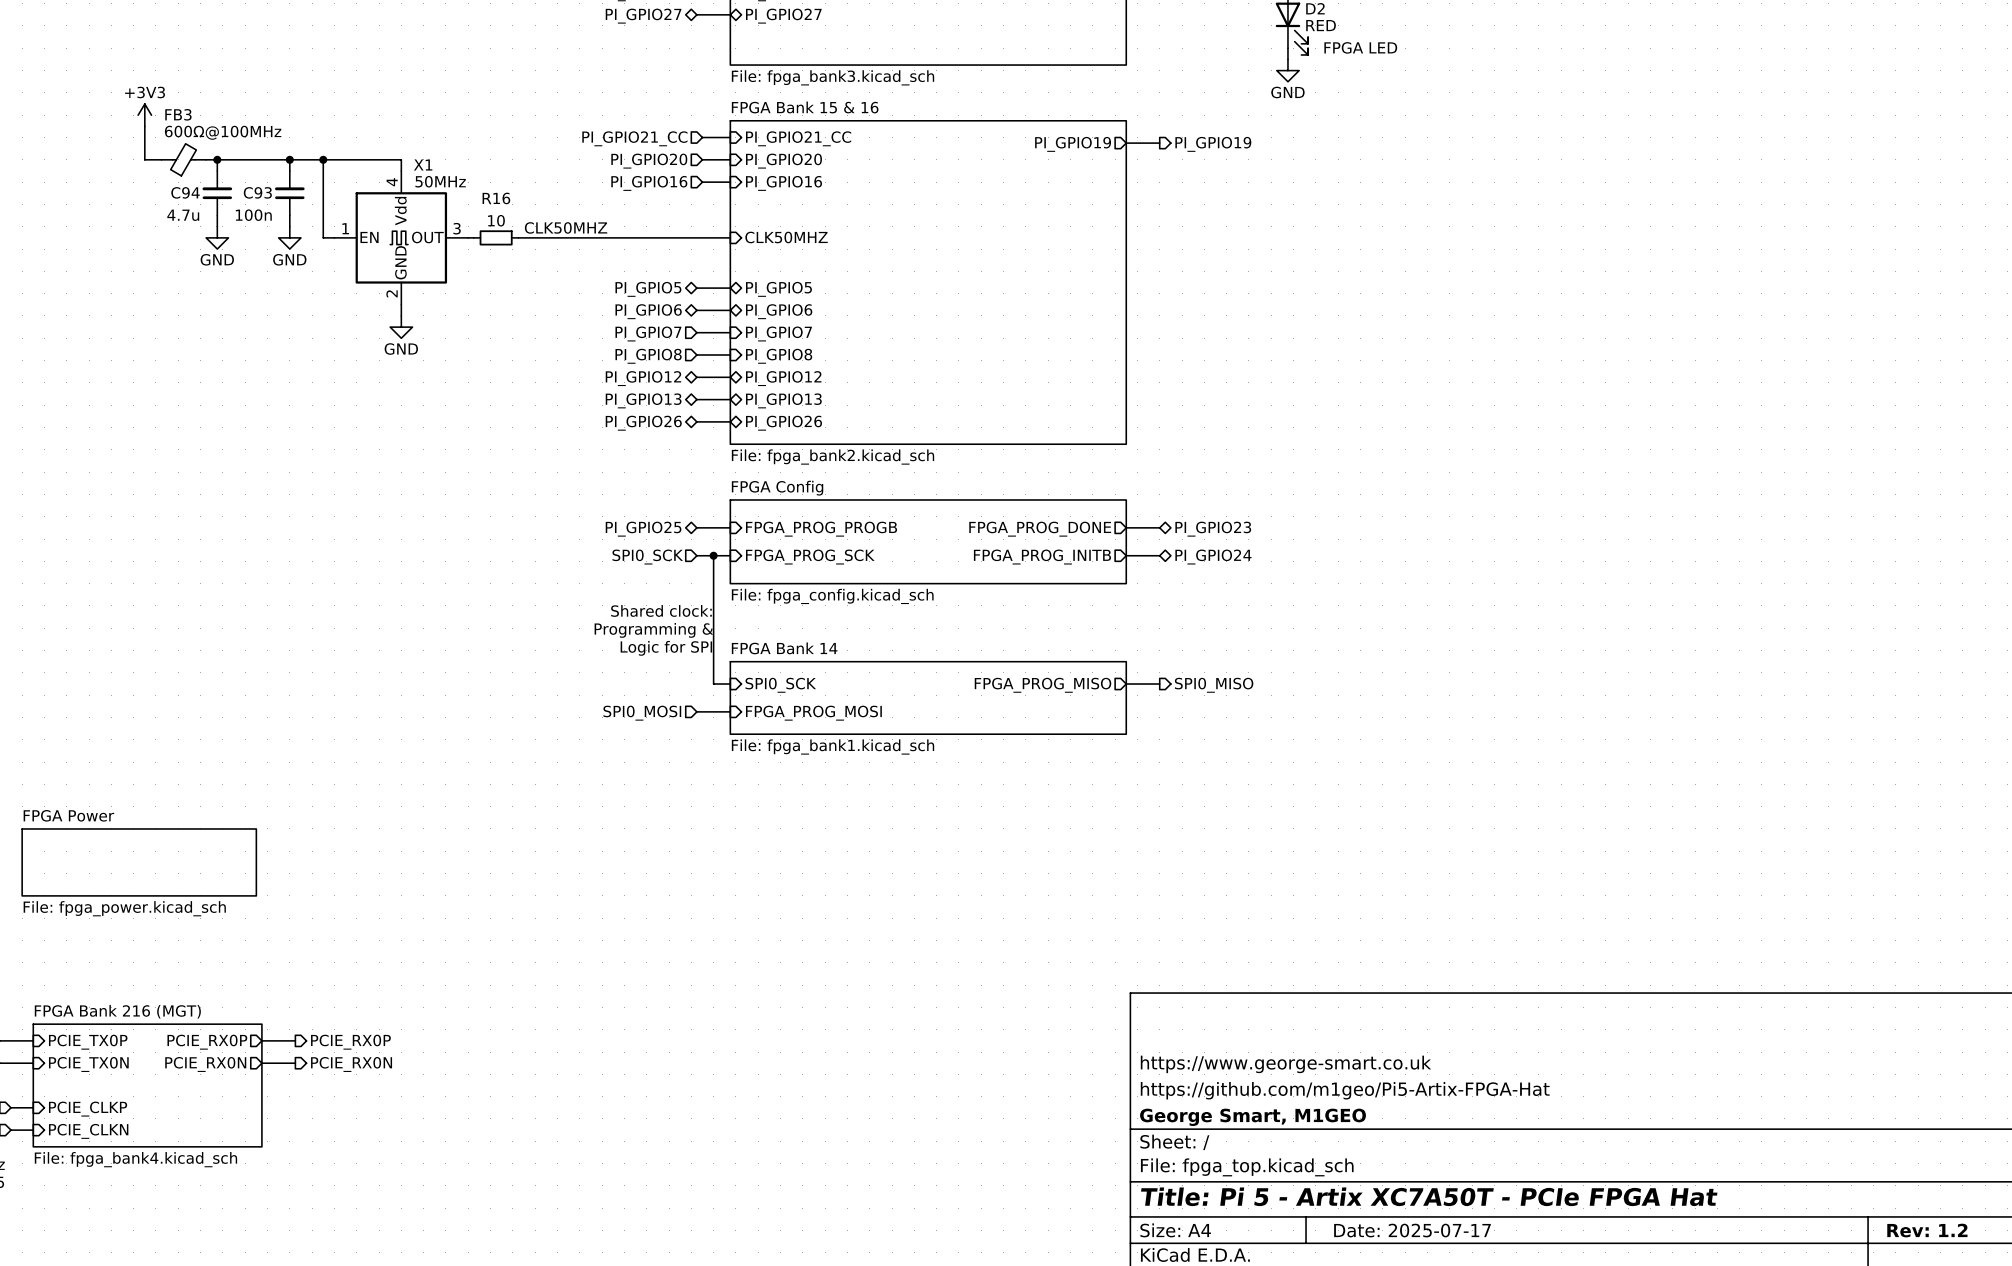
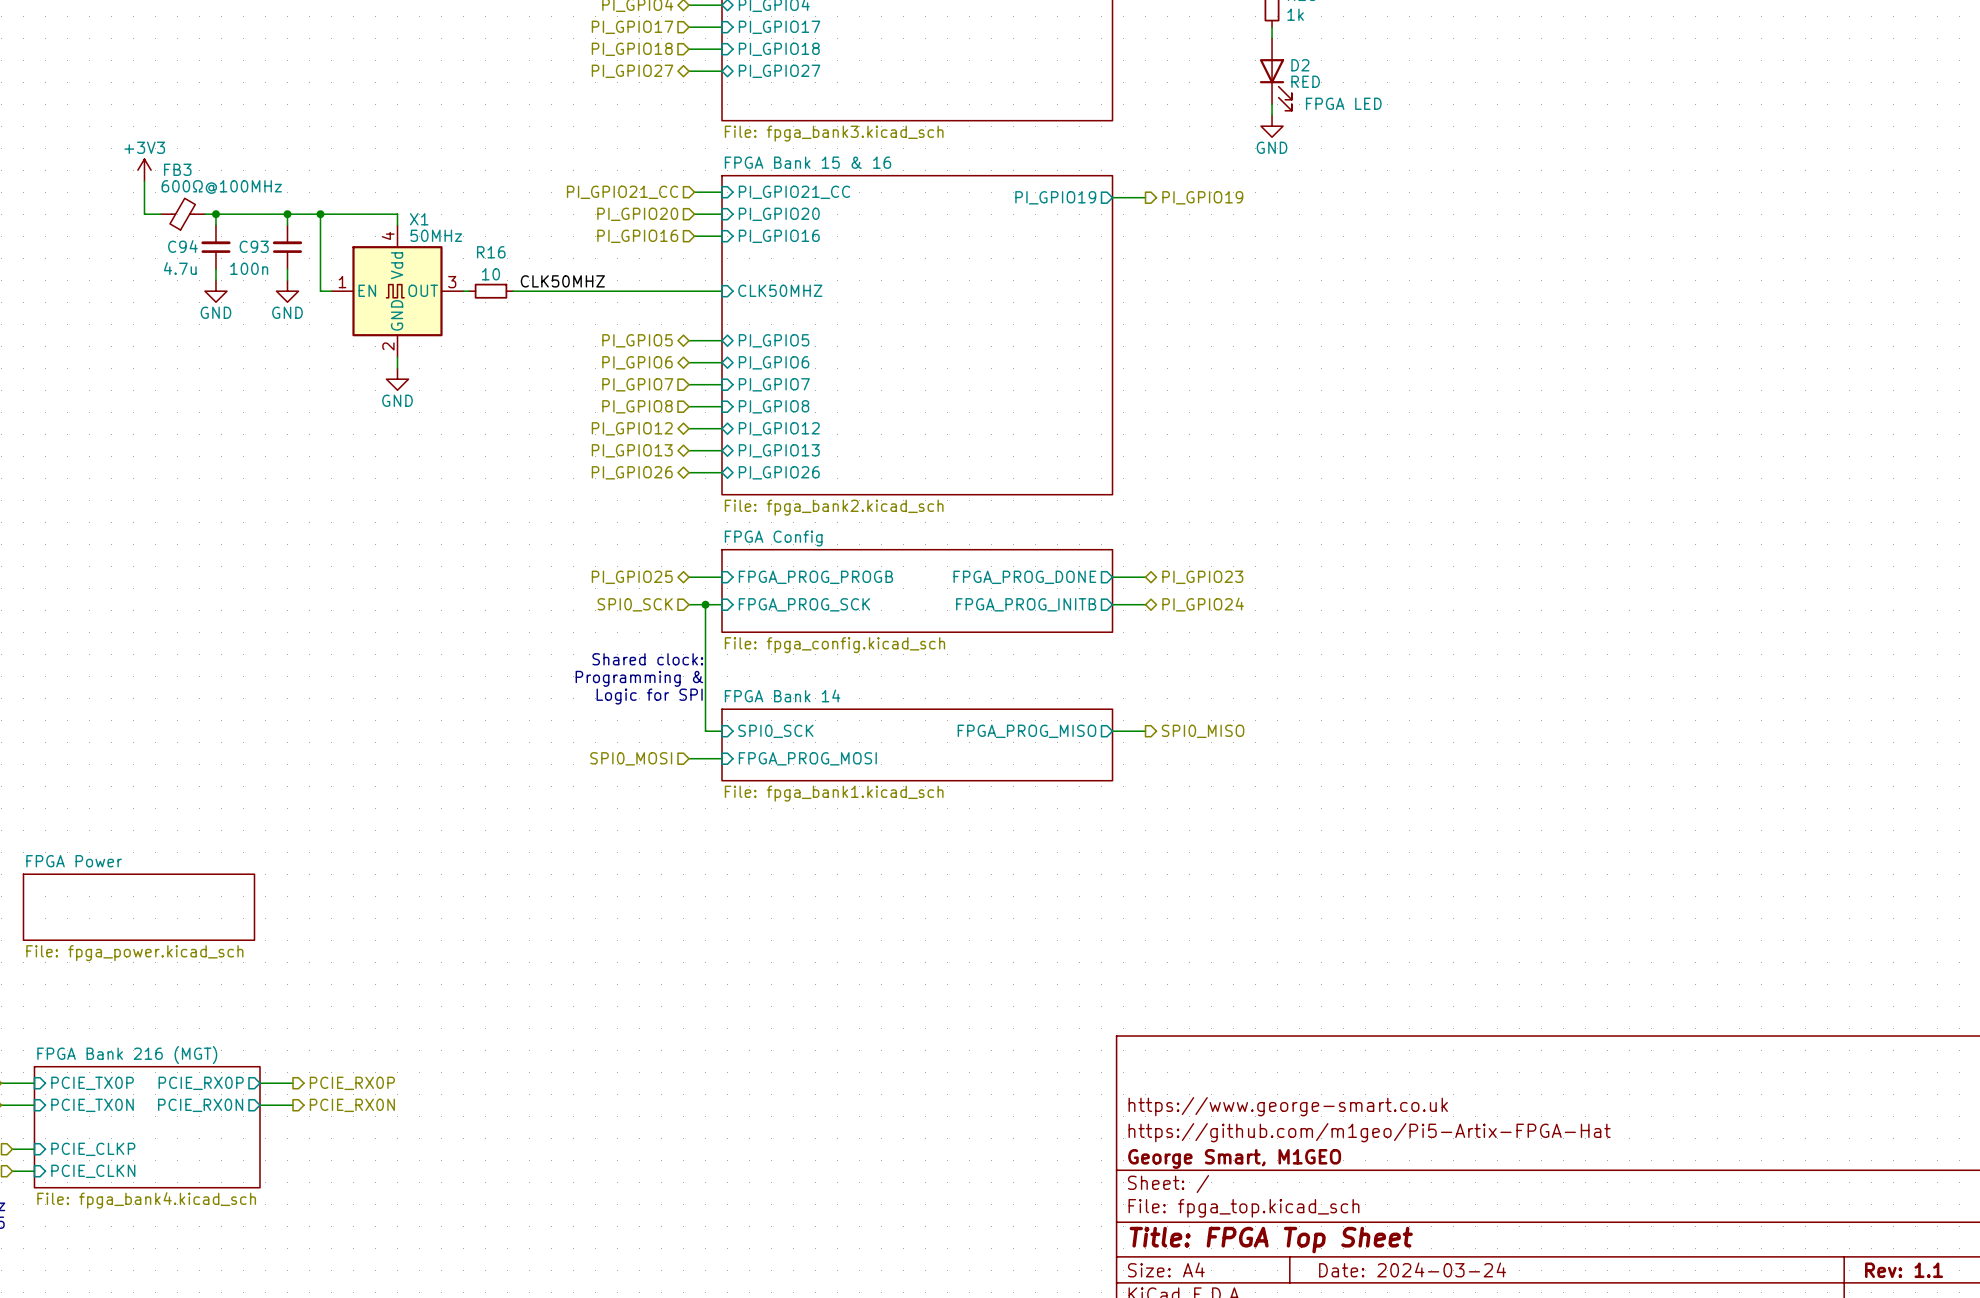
title block: Title: Pi 5 - Artix XC7A50T - PCIe FPGA Hat (1429, 1196) -> Title: FPGA Top Sheet (1271, 1240)
title block: Date: 2025-07-17 (1412, 1230) -> Date: 2024-03-24 (1412, 1269)
title block: Rev: 1.2 (1927, 1230) -> Rev: 1.1 (1904, 1270)

